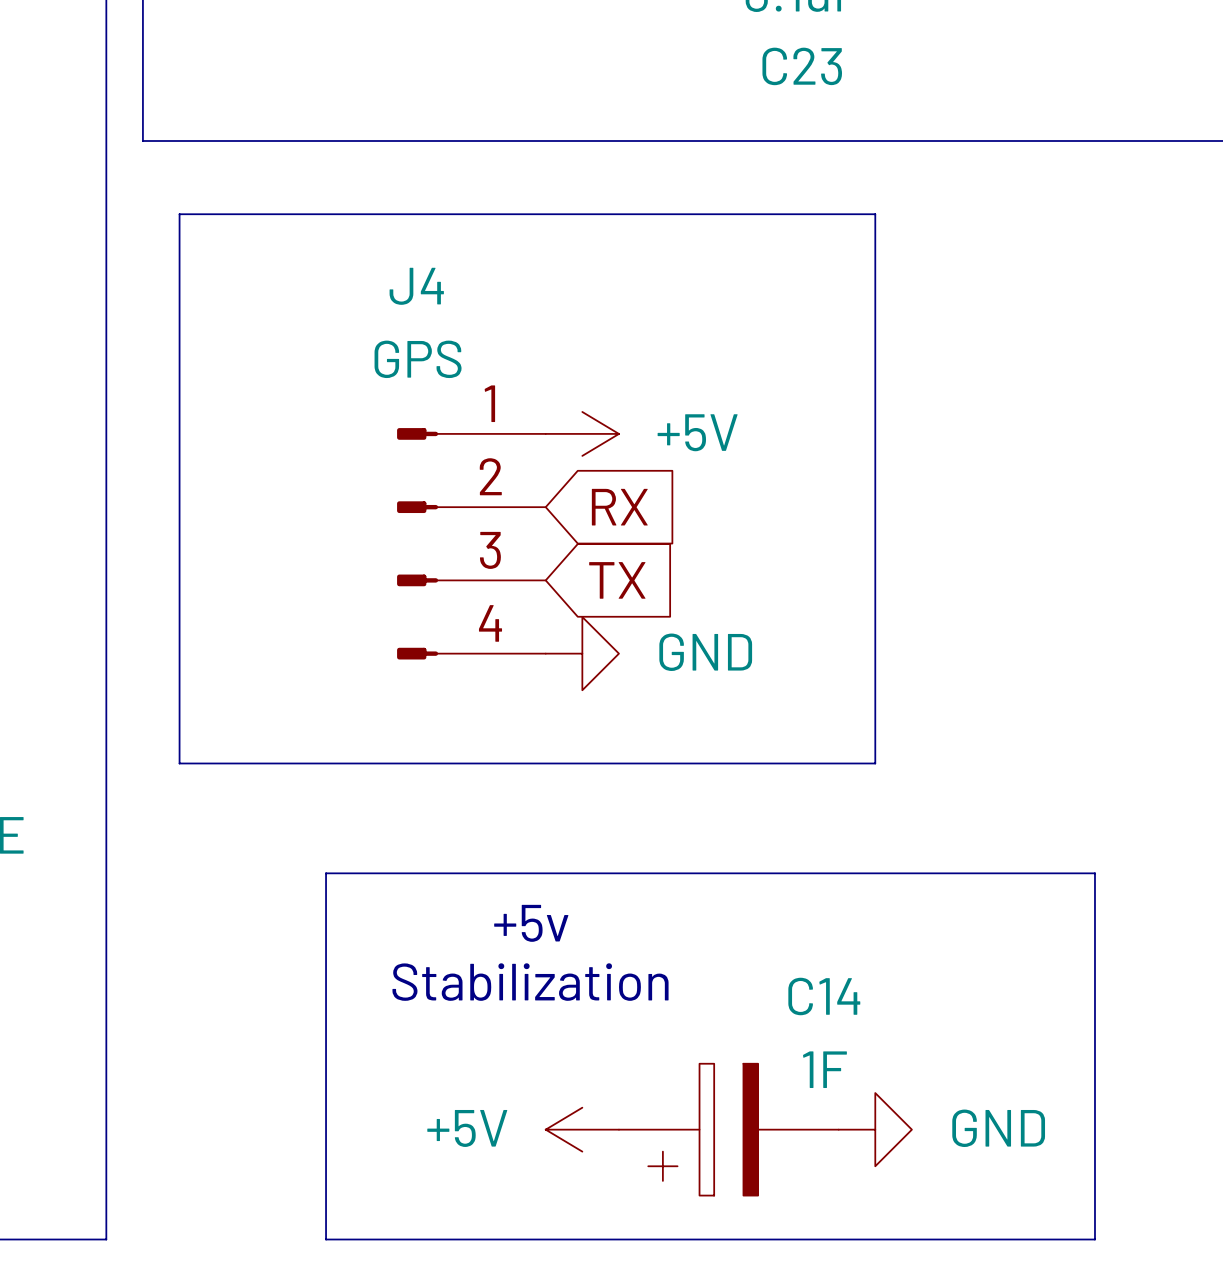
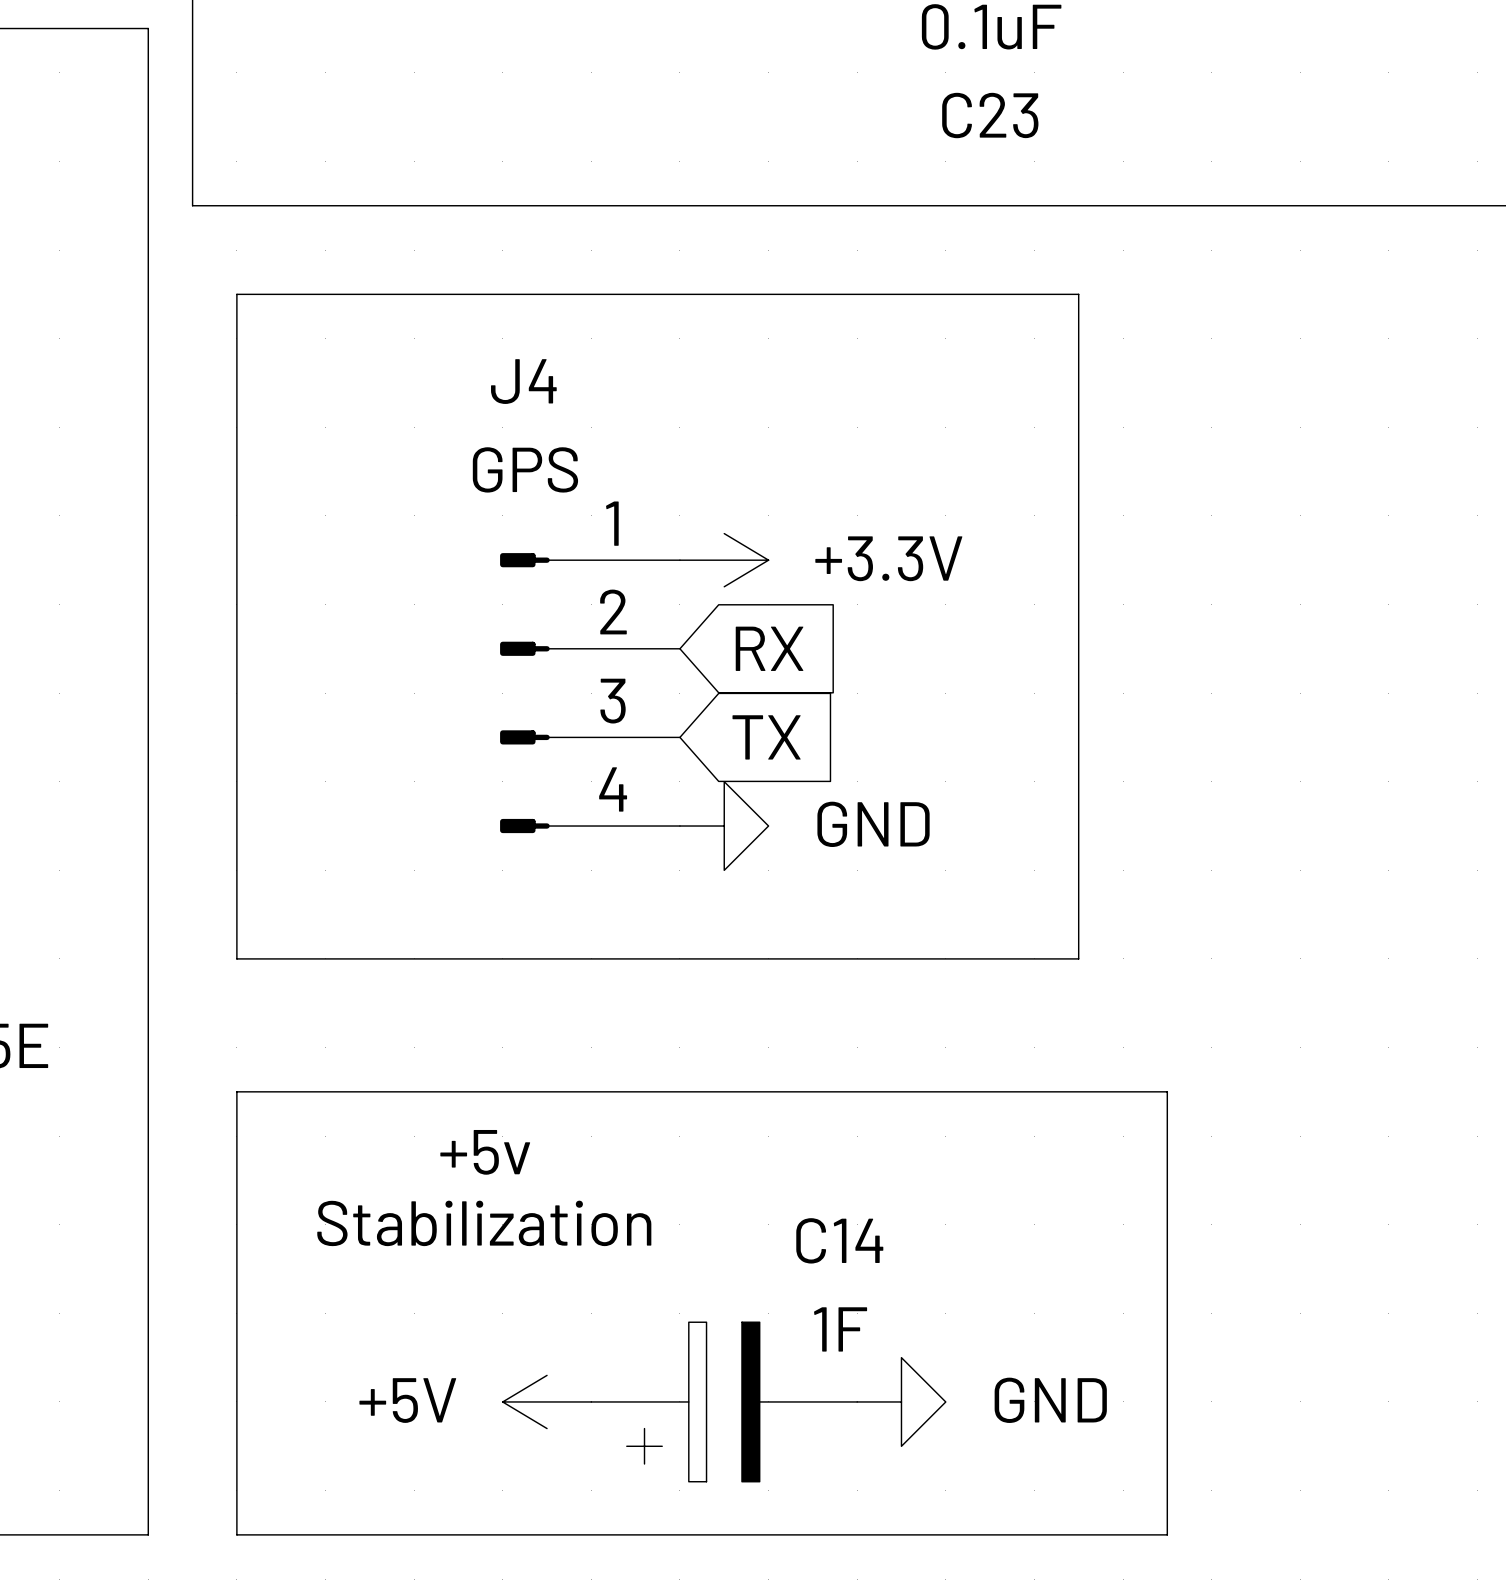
power symbol: +5V (582, 433) -> +3.3V (724, 560)
line: (326, 873) (326, 1239) -> (414, 1091) (236, 1091) (236, 1534) (414, 1534)
line: (948, 873) (1094, 873) (1094, 1239) (948, 1239) -> (1167, 1091) (1167, 1534)
text position: +5v (531, 923) -> +5v (485, 1152)
text position: Stabilization (530, 982) -> Stabilization (484, 1223)
power symbol position: +5V (582, 1129) -> +5V (547, 1401)
C14 position: (728, 1129) -> (724, 1401)
power symbol position: GND (875, 1129) -> GND (901, 1401)

